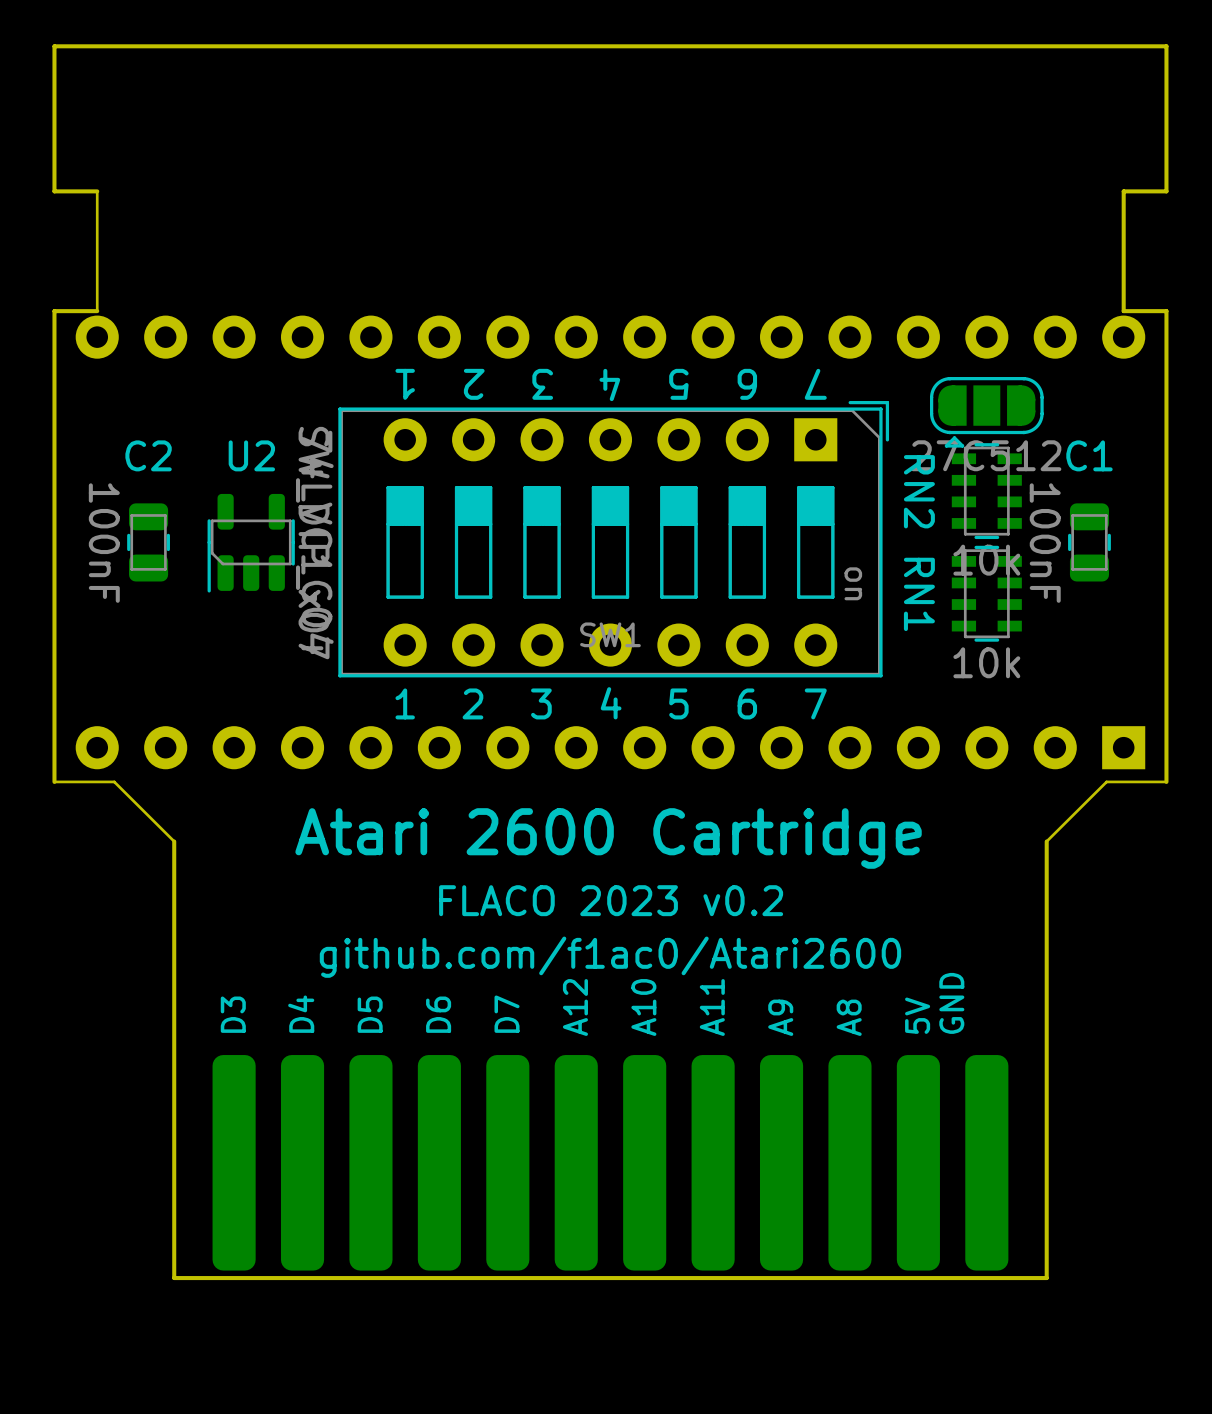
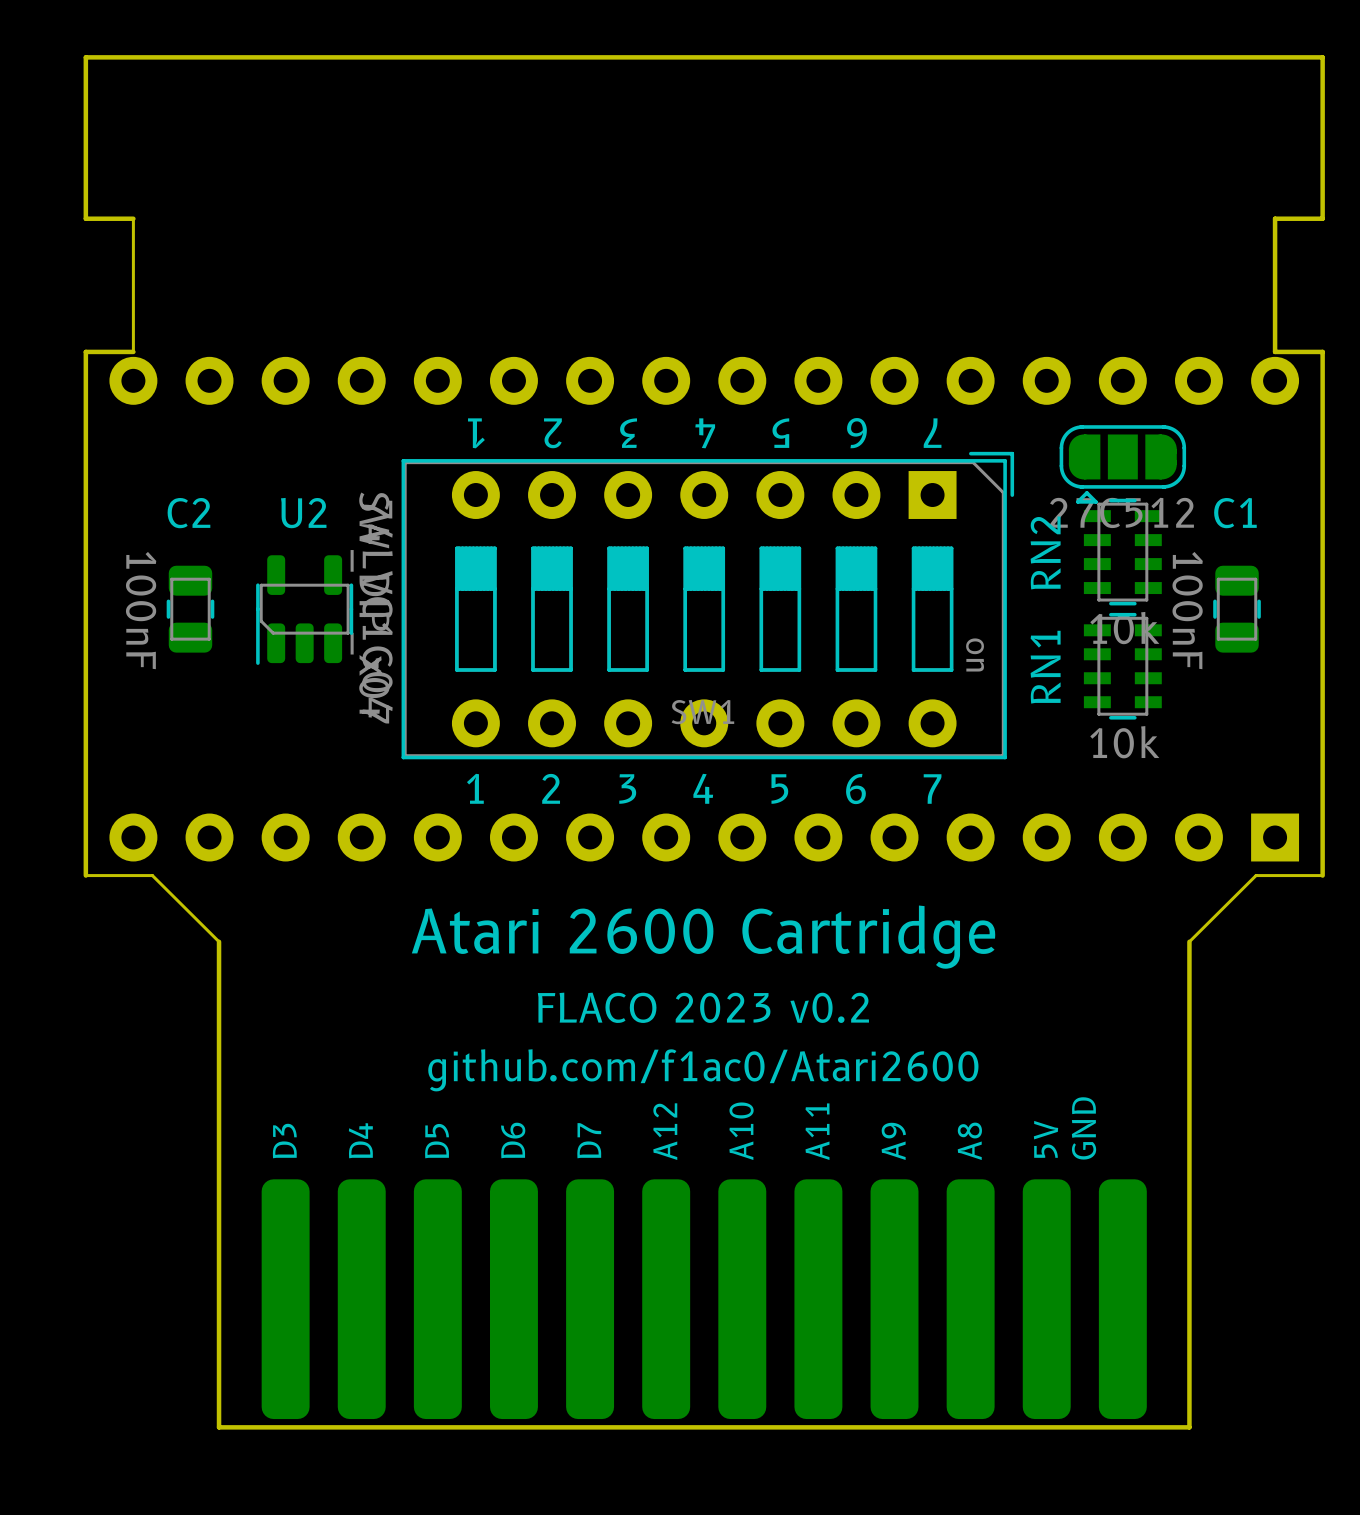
RN2 name rotation: 0° (919, 491) -> 180° (1045, 552)
RN1 name rotation: 0° (919, 594) -> 180° (1045, 667)

